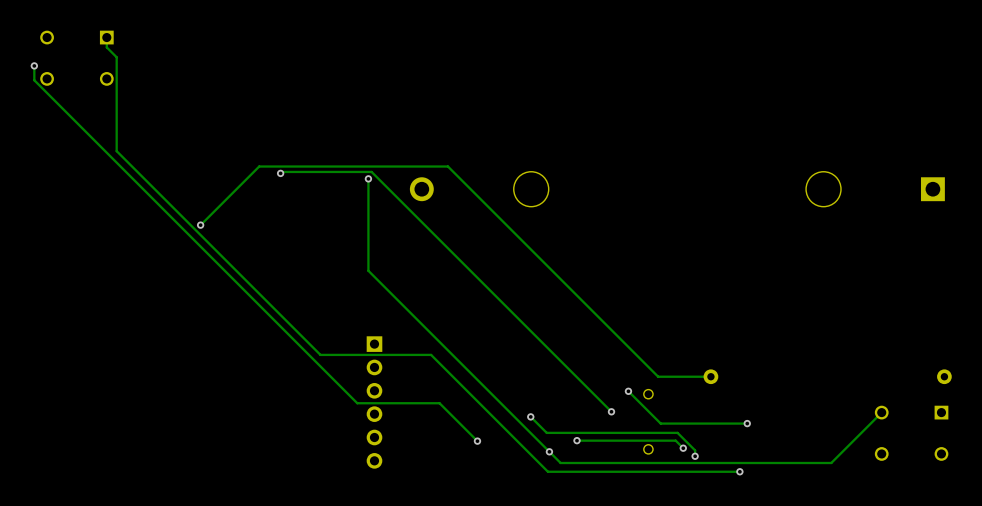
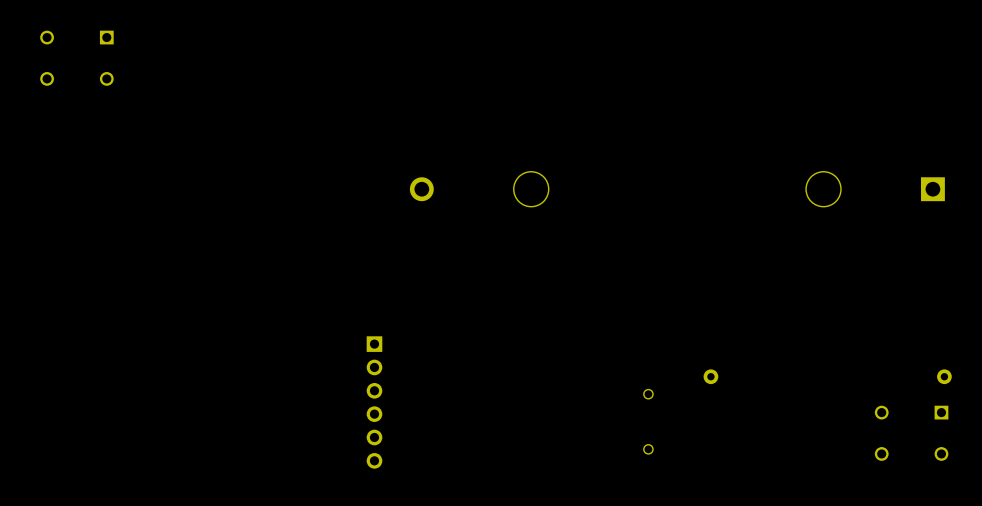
track: (106, 37) (106, 47) (116, 57) (116, 151) (320, 354) (431, 354) (547, 471) (739, 471) -> none
track: (34, 65) (34, 80) (357, 403) (439, 403) (477, 441) -> none
via: (34, 65) -> none
track: (280, 173) (371, 171) (611, 411) -> none
via: (280, 173) -> none
track: (368, 178) (368, 270) (560, 463) (831, 463) (881, 412) -> none
via: (368, 178) -> none
track: (200, 225) (259, 166) (447, 166) (658, 376) (710, 376) -> none
via: (200, 225) -> none
track: (628, 391) (660, 423) (747, 423) -> none
via: (628, 391) -> none
via: (611, 411) -> none
track: (530, 416) (546, 432) (677, 432) (695, 450) (695, 456) -> none
via: (530, 416) -> none
via: (747, 423) -> none
track: (576, 440) (675, 440) (683, 448) -> none
via: (576, 440) -> none
via: (477, 441) -> none
via: (683, 448) -> none
via: (549, 451) -> none
via: (695, 456) -> none
via: (739, 471) -> none

